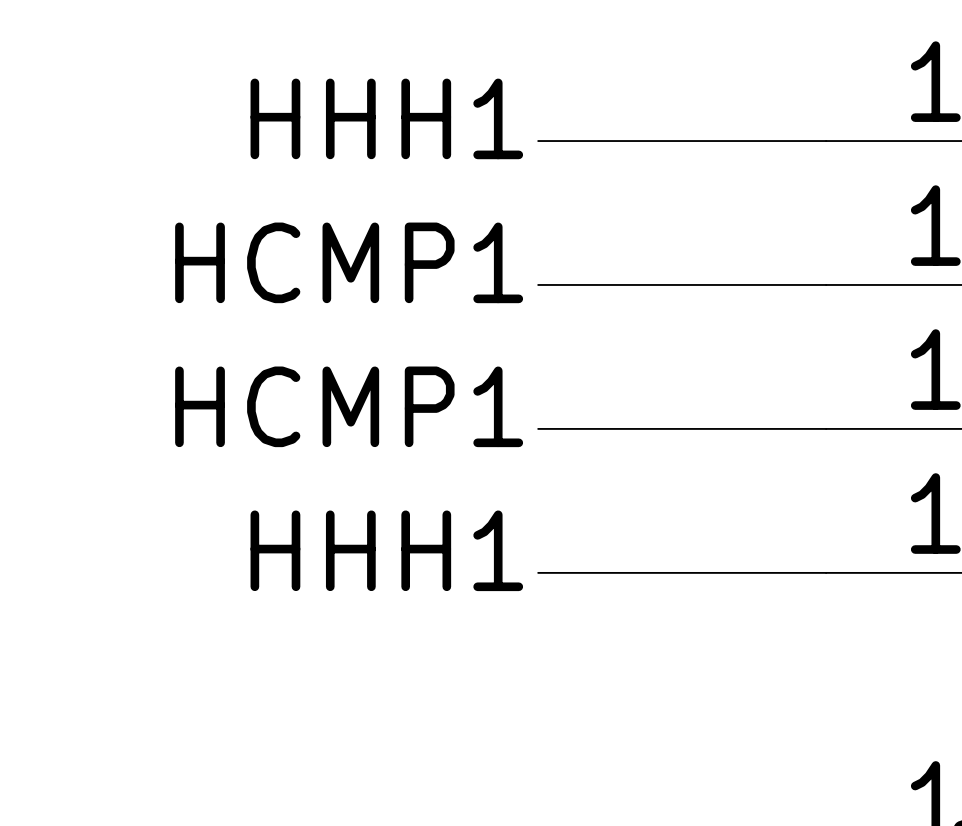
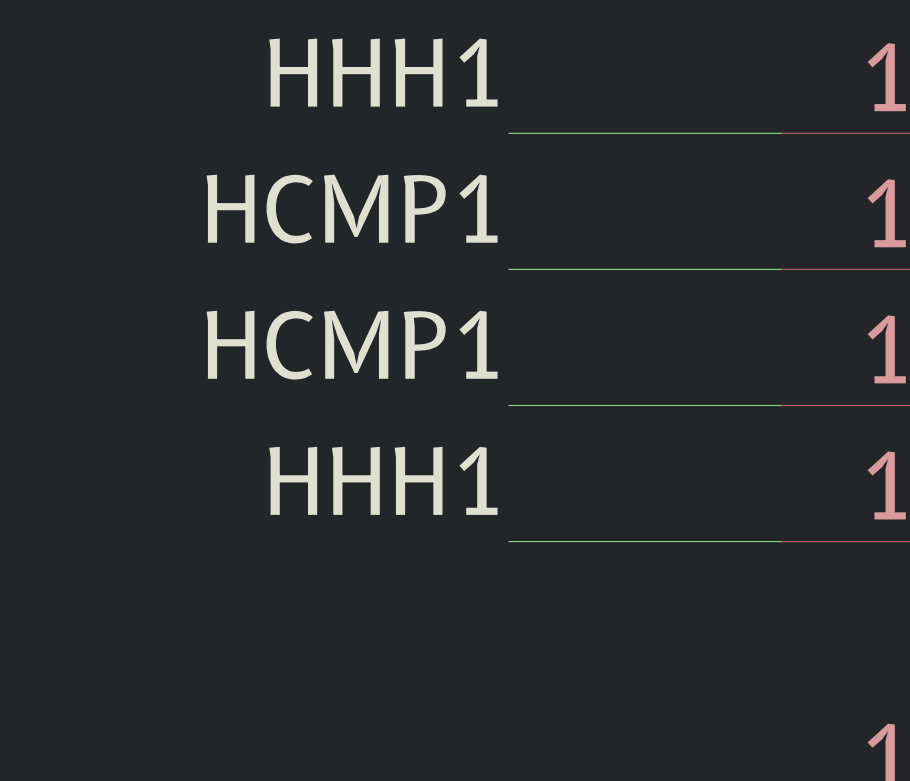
label position: HHH1 (386, 118) -> HHH1 (383, 72)
label position: HCMP1 (349, 262) -> HCMP1 (352, 209)
label position: HCMP1 (349, 406) -> HCMP1 (352, 345)
label position: HHH1 (386, 550) -> HHH1 (383, 480)

